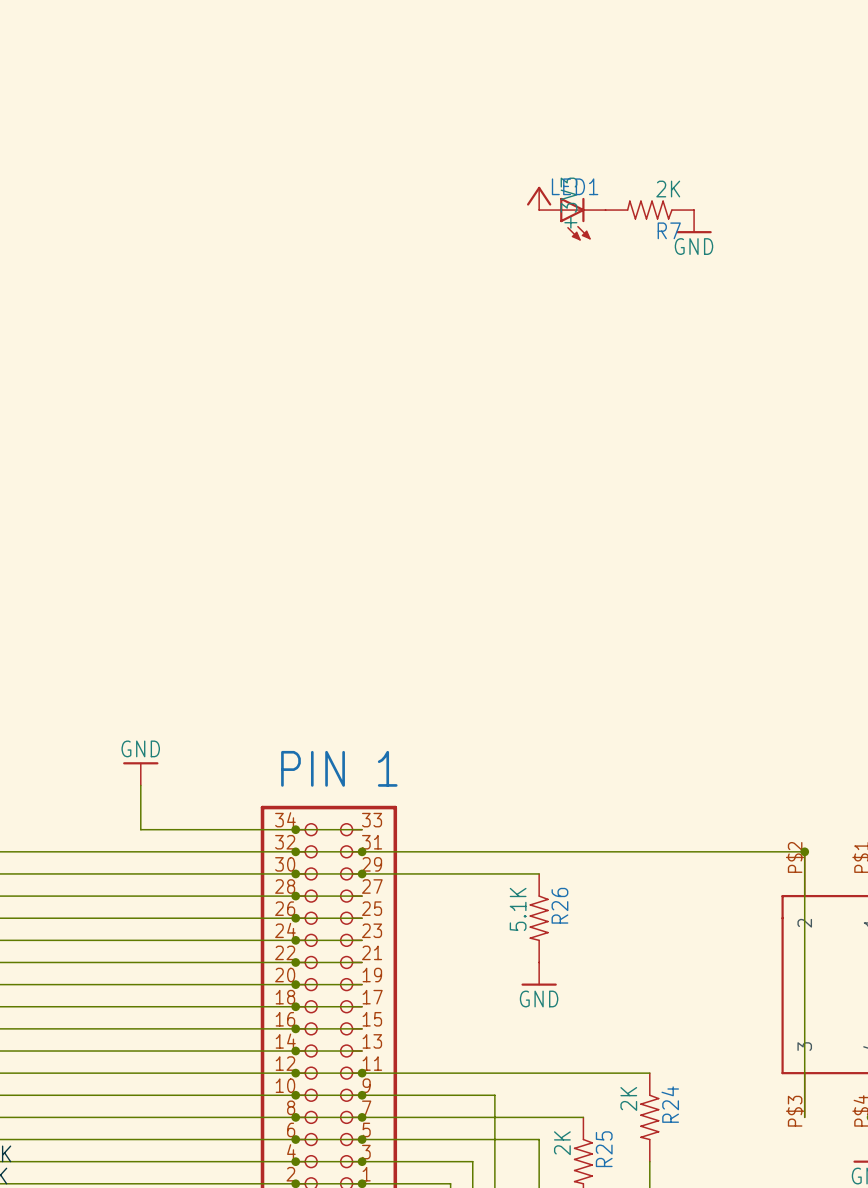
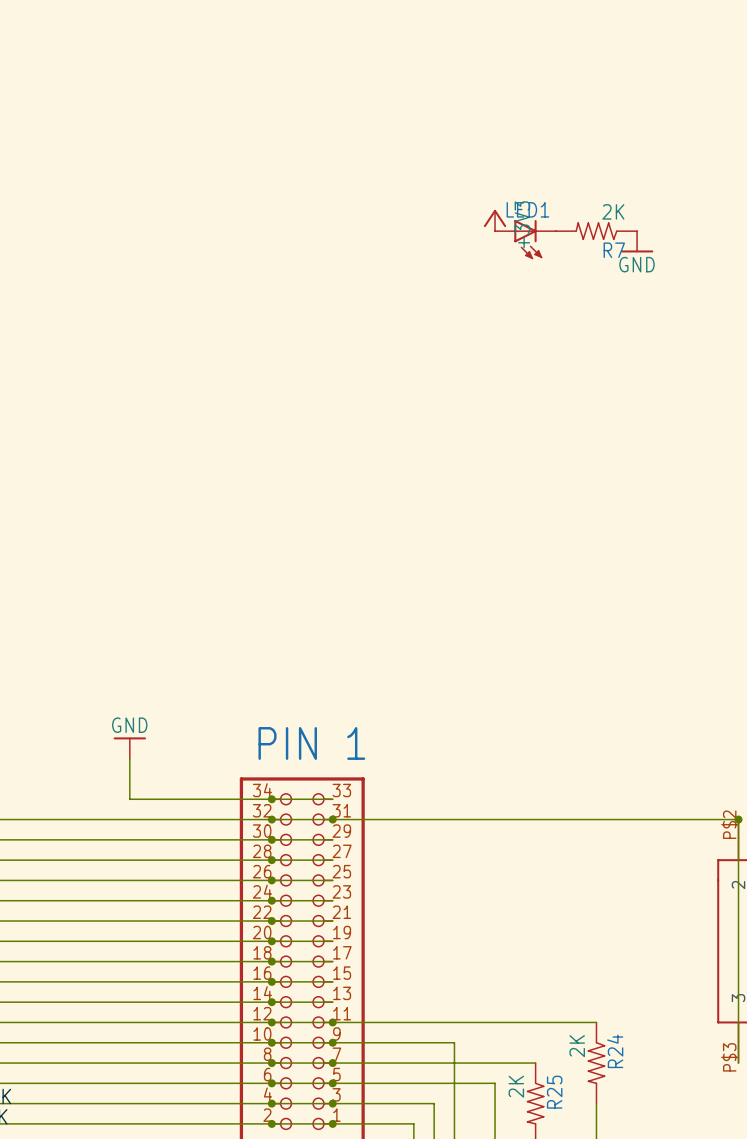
wire: (362, 873) (539, 873) -> none
junction: (362, 873) -> none
R26: 5.1K (539, 918) -> none
power symbol: GND (539, 974) -> none

